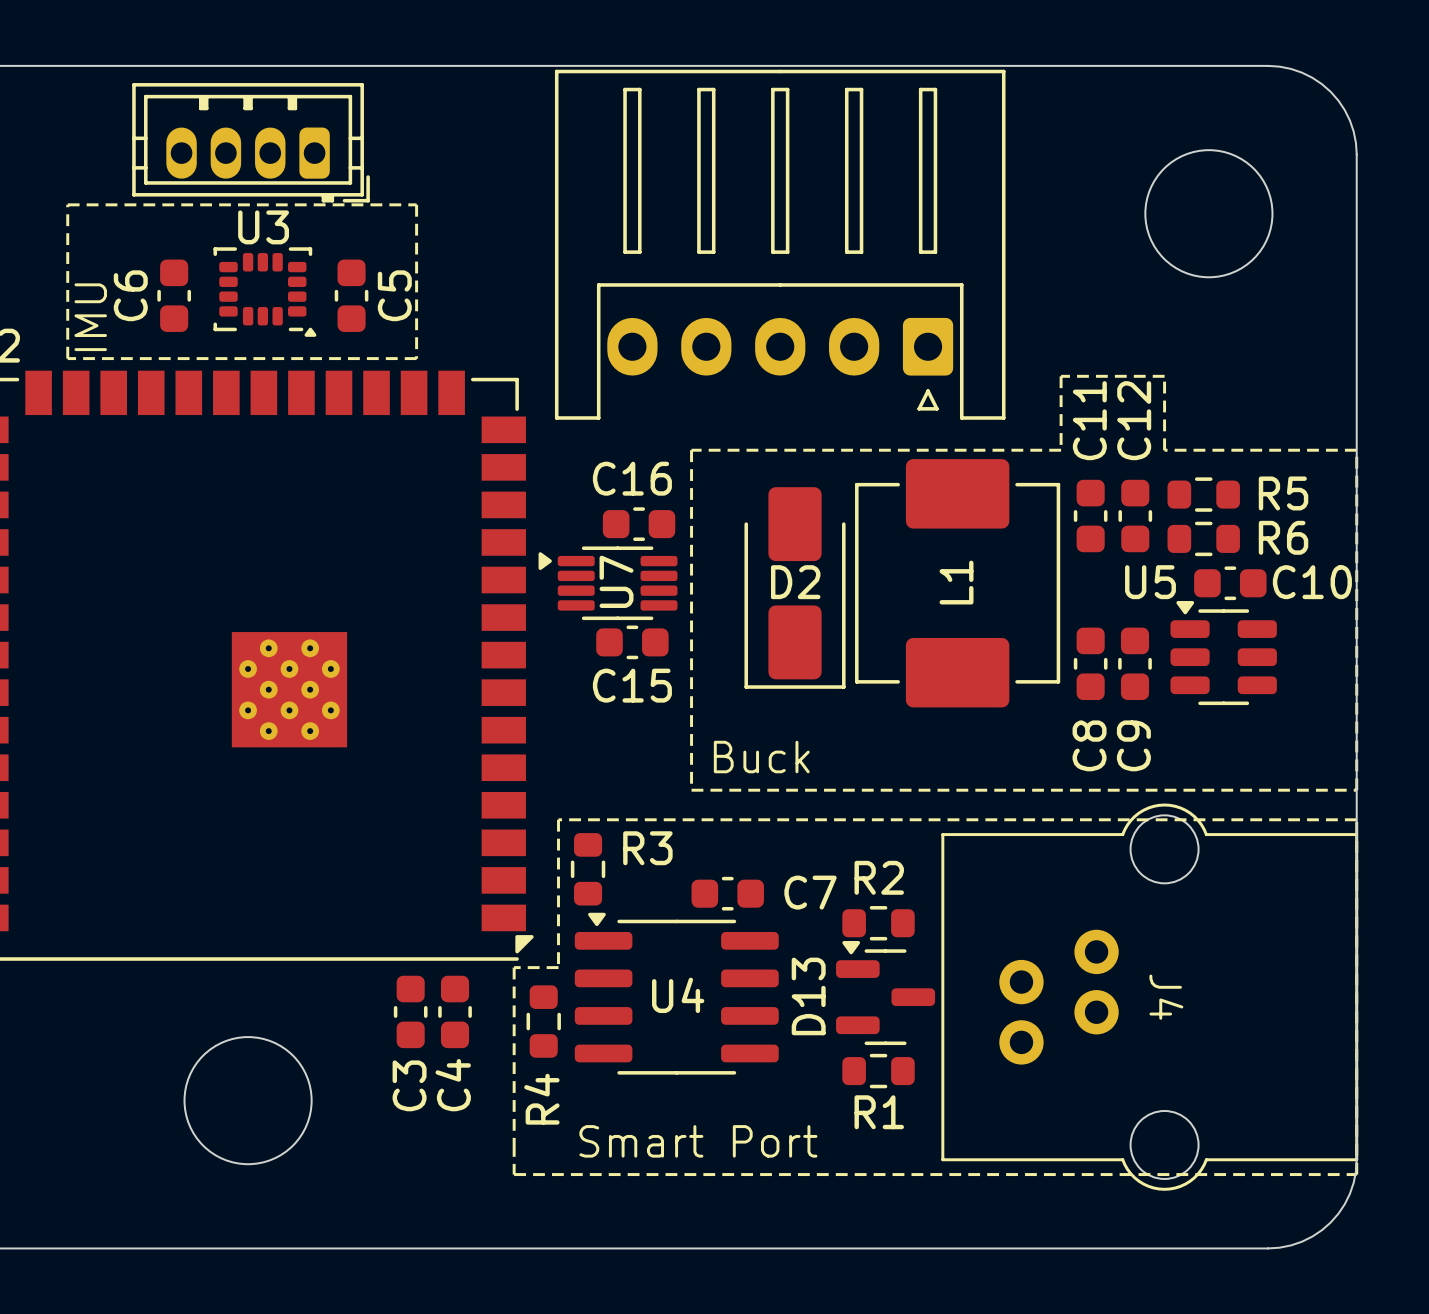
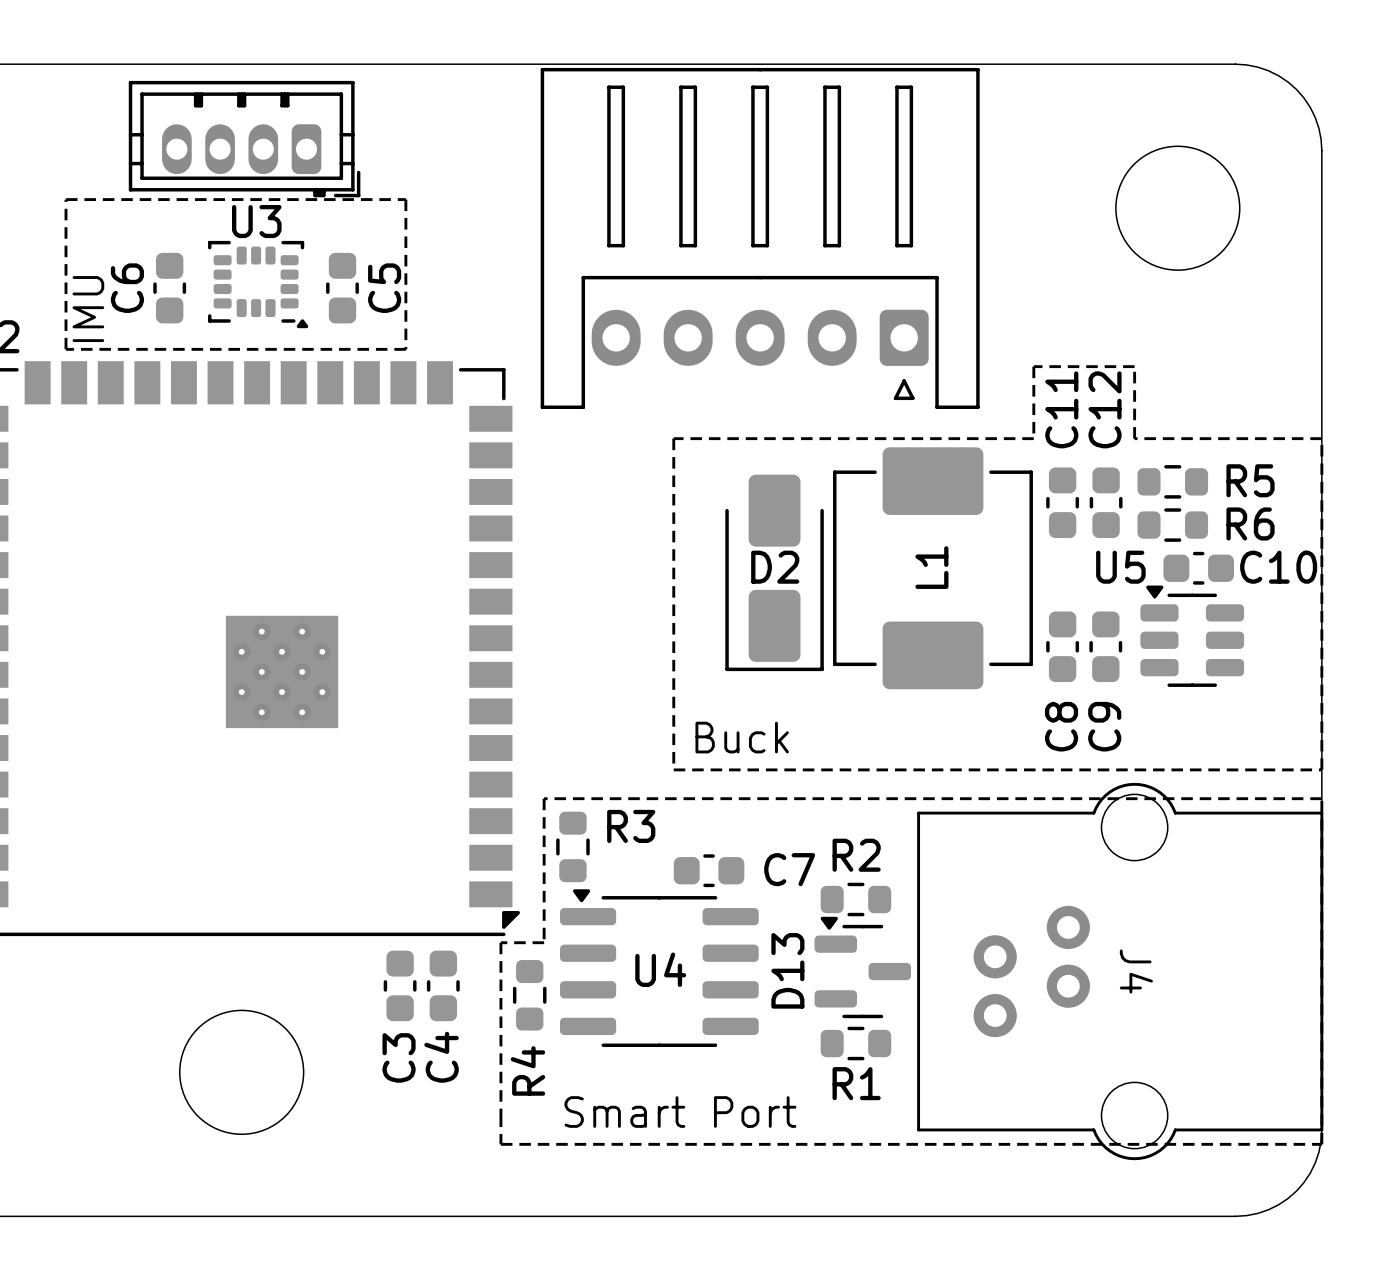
C16: (639, 524) -> none
U7: (608, 583) -> none
C15: (632, 642) -> none

